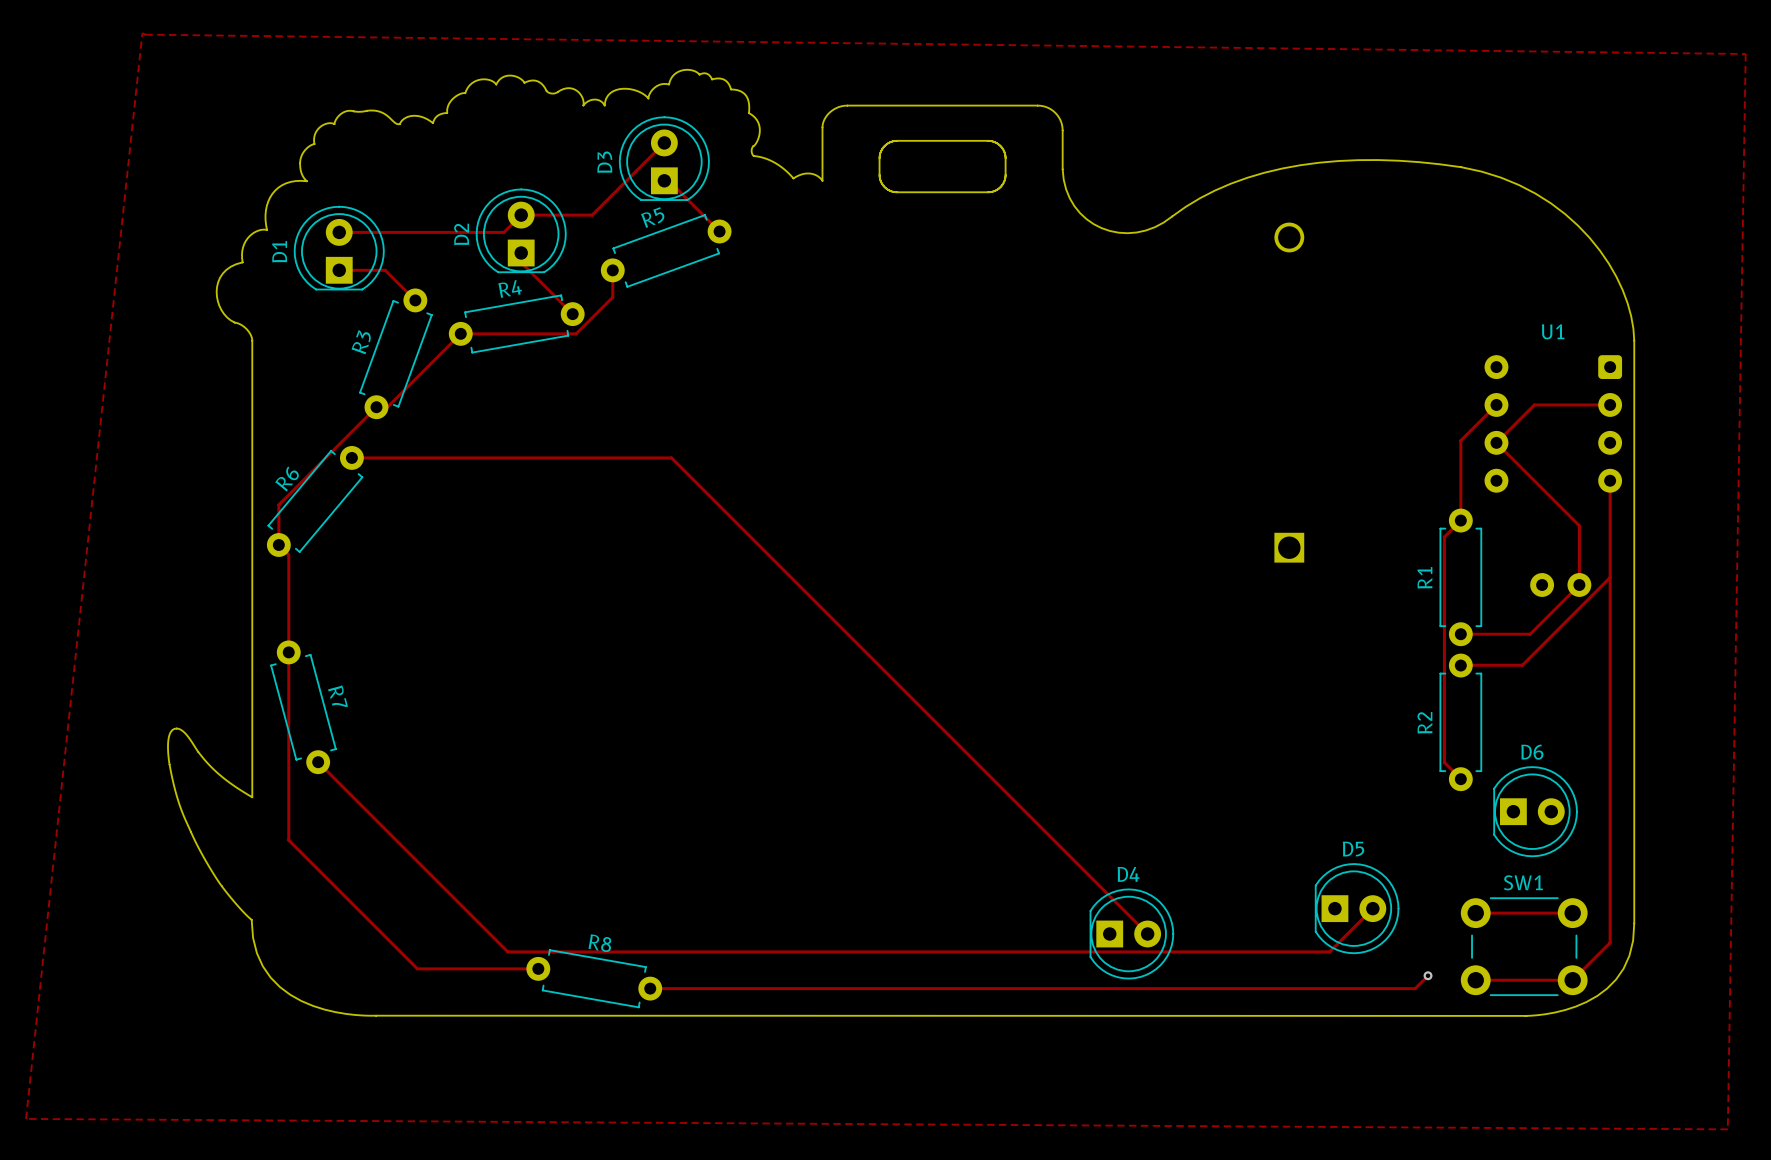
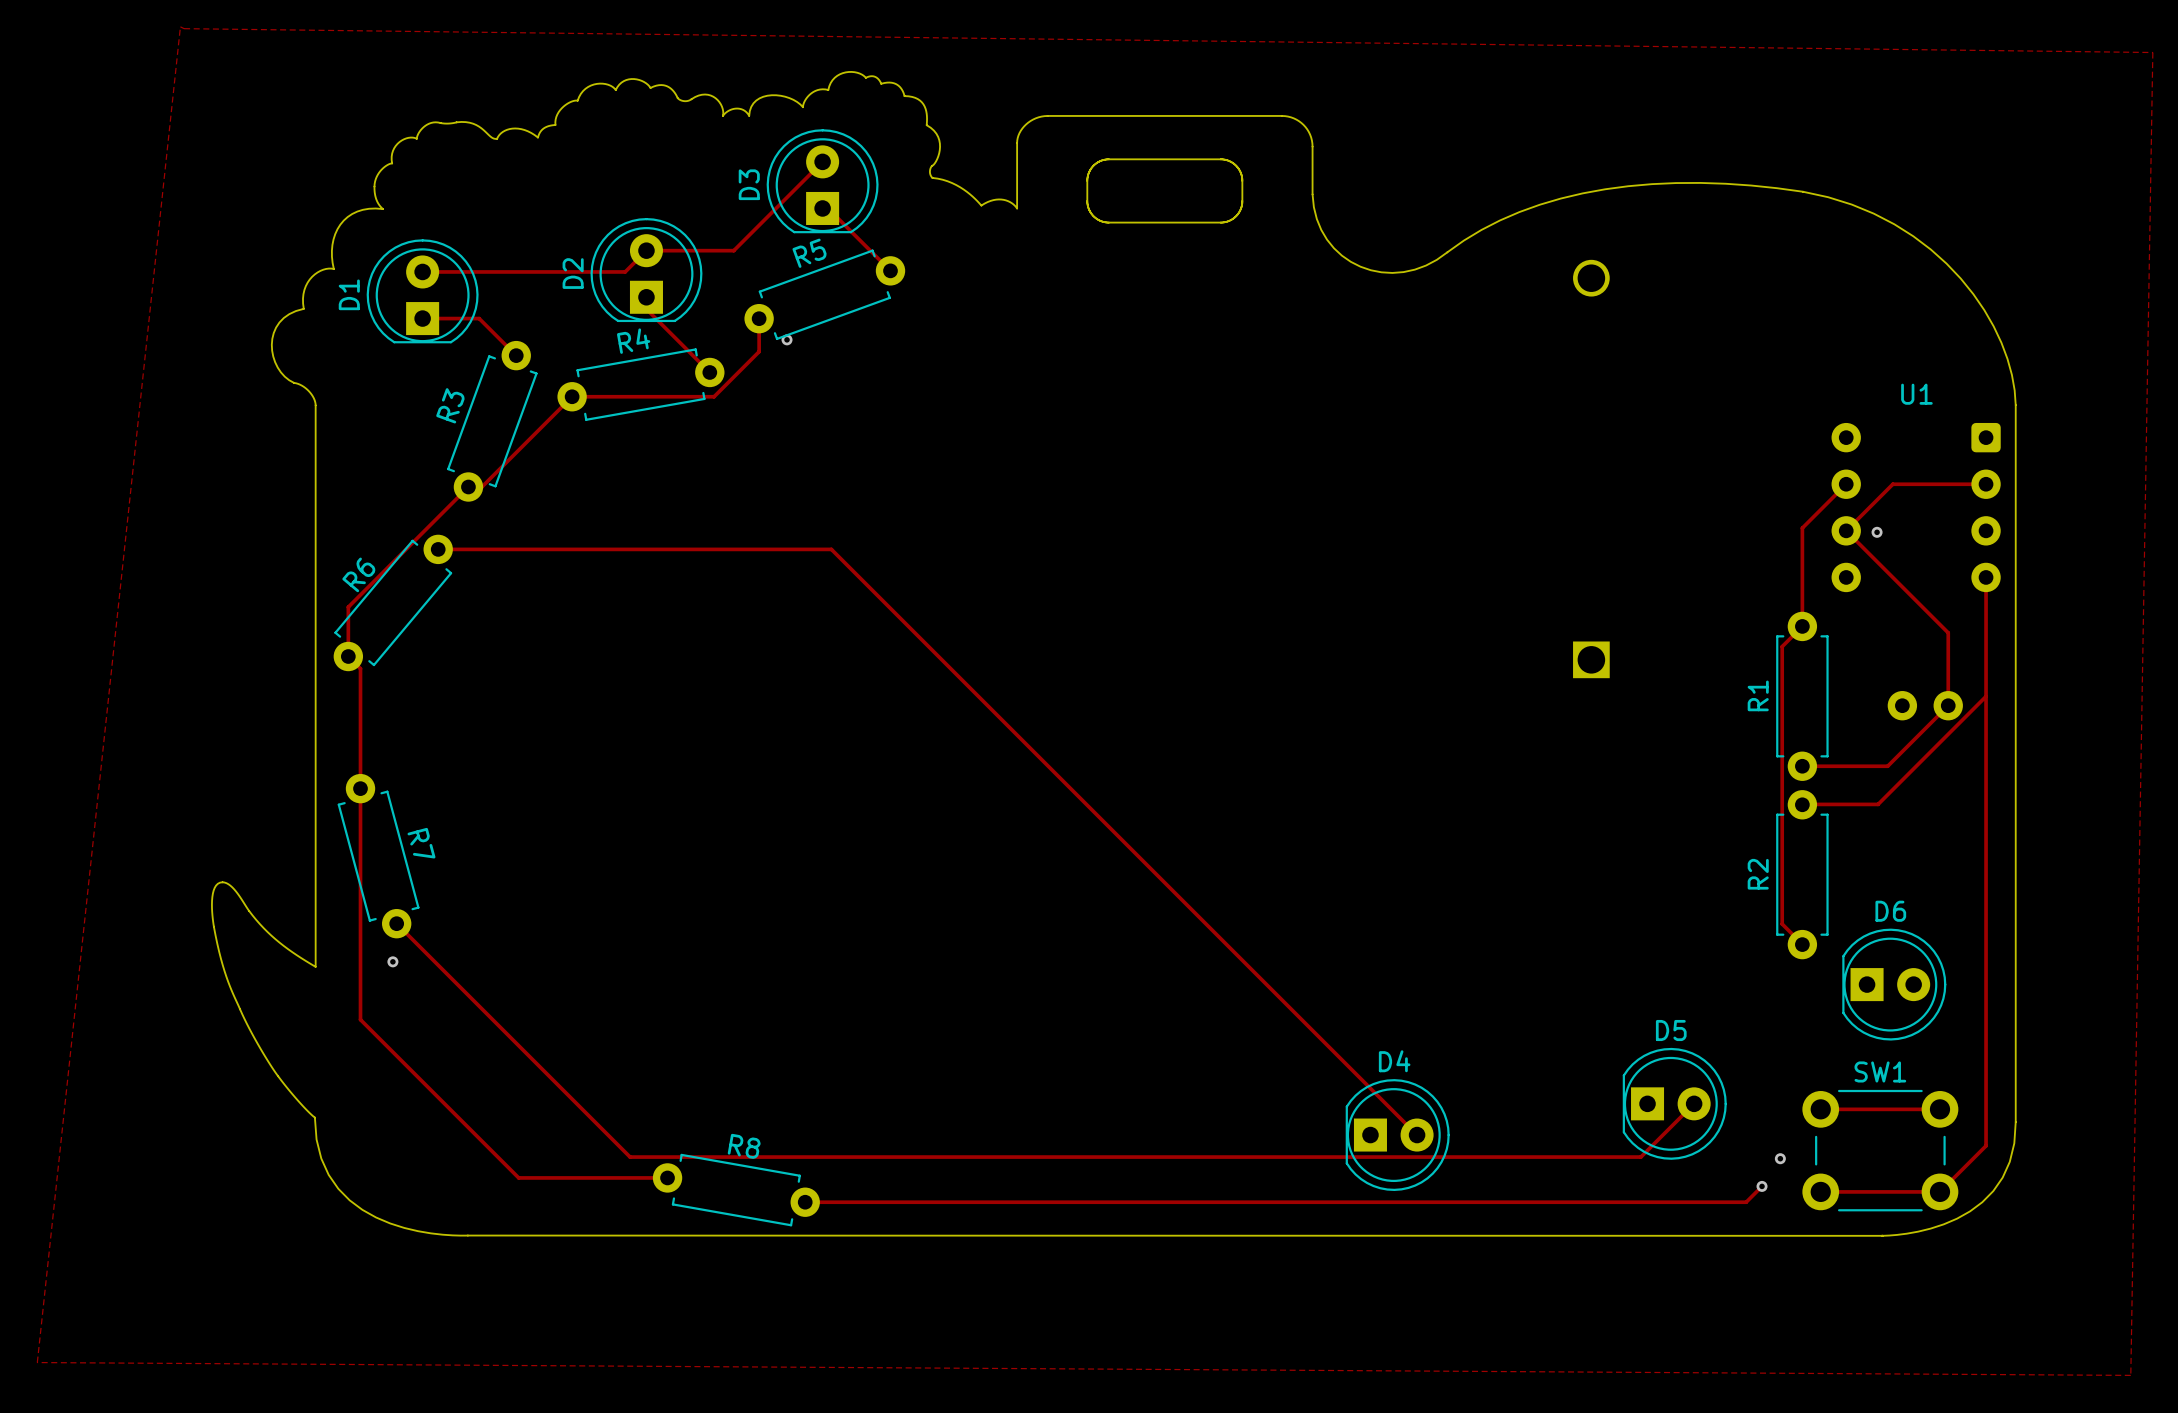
via: none -> (787, 339)
via: none -> (1877, 532)
via: none -> (392, 961)
via: none -> (1780, 1158)

